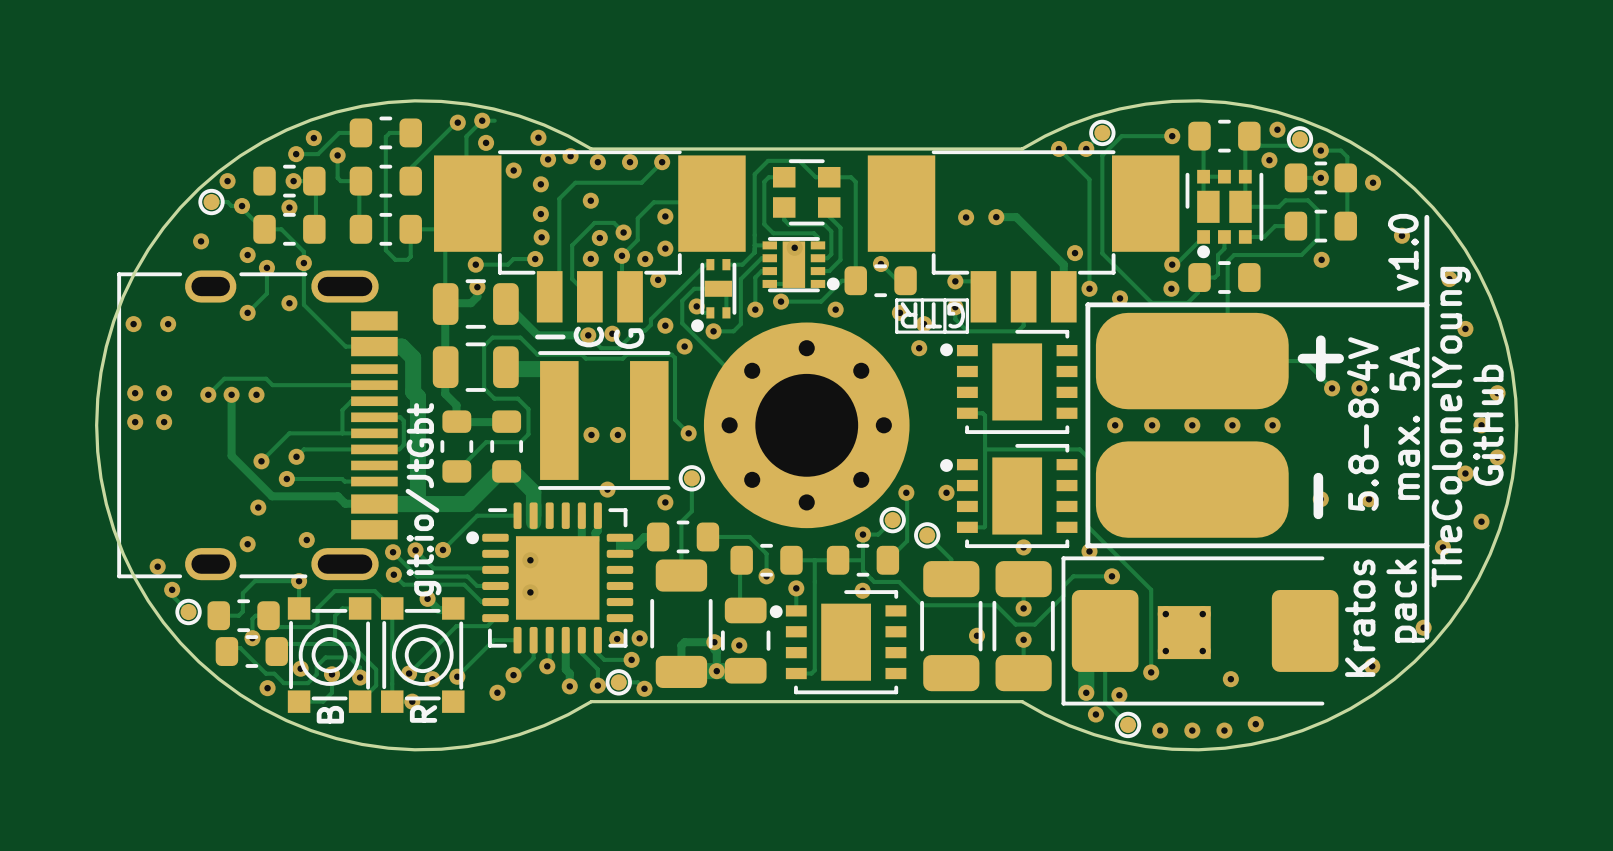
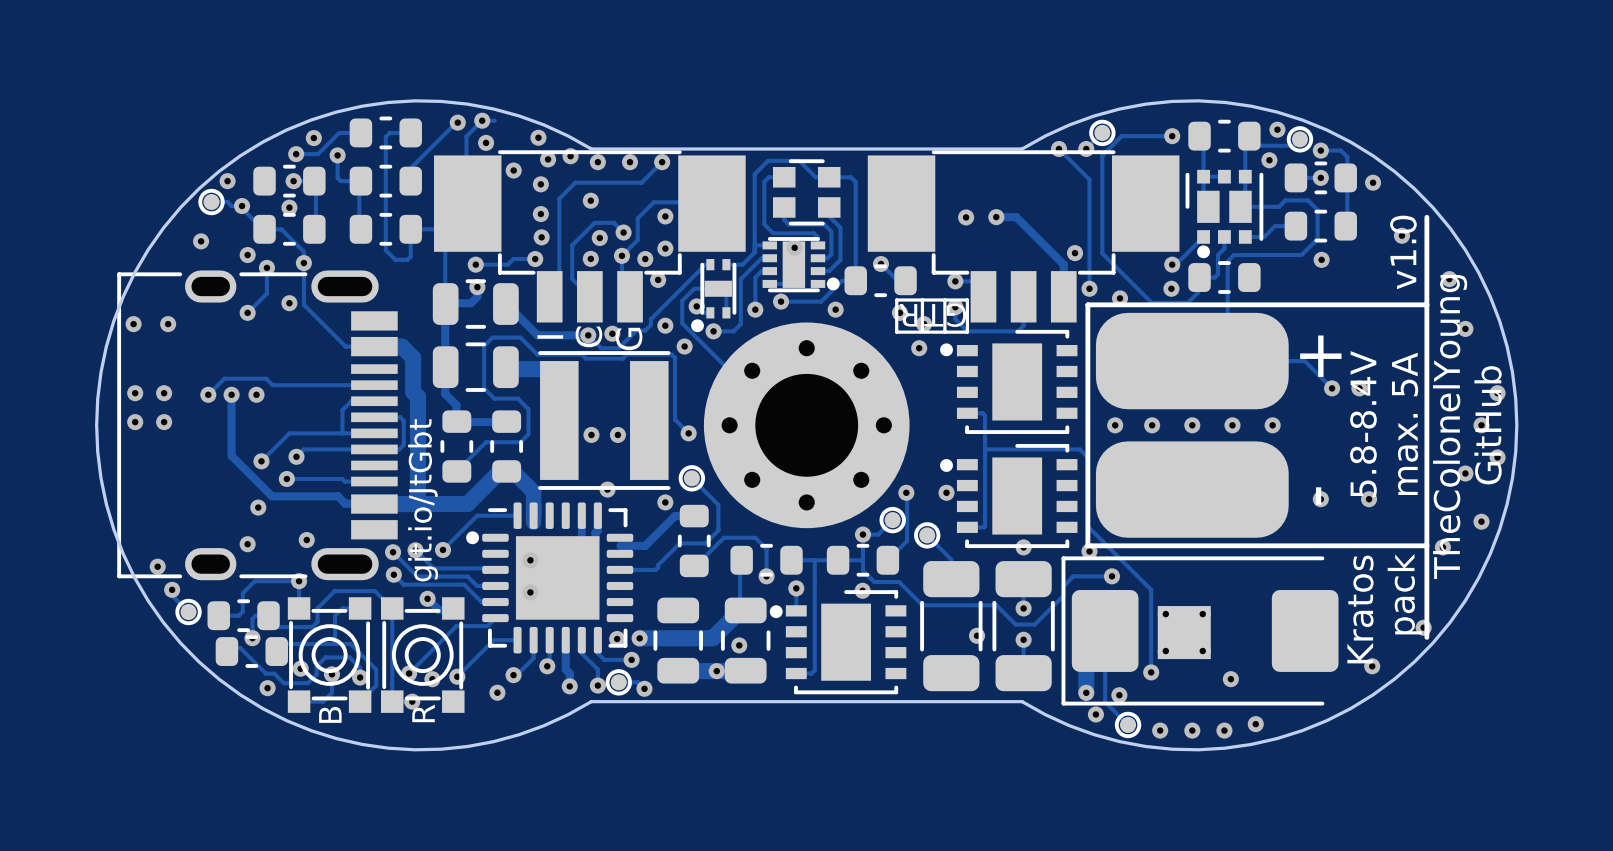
track: (691, 478) (691, 511) (681, 521) (681, 575) -> (691, 478) (718, 504) (718, 530) (705, 543) (679, 543) (655, 569) (619, 569)
track: (658, 536) (644, 536) (636, 545) (619, 545) -> (694, 516) (675, 516) (645, 545) (620, 545)
part rotation: 0° (683, 536) -> 90° clockwise (694, 540)
track: (707, 536) (749, 536) (766, 553) -> (694, 565) (724, 537) (755, 537) (766, 549) (766, 553)
part footprint: [650, 559, 713, 688] -> [653, 597, 703, 684]
track: none -> (745, 610) (740, 610) (712, 638) (639, 638)
via: (714, 642) -> none
track: (716, 671) (716, 651) (714, 649) (714, 642) (684, 642) (681, 645) (681, 671) -> none

